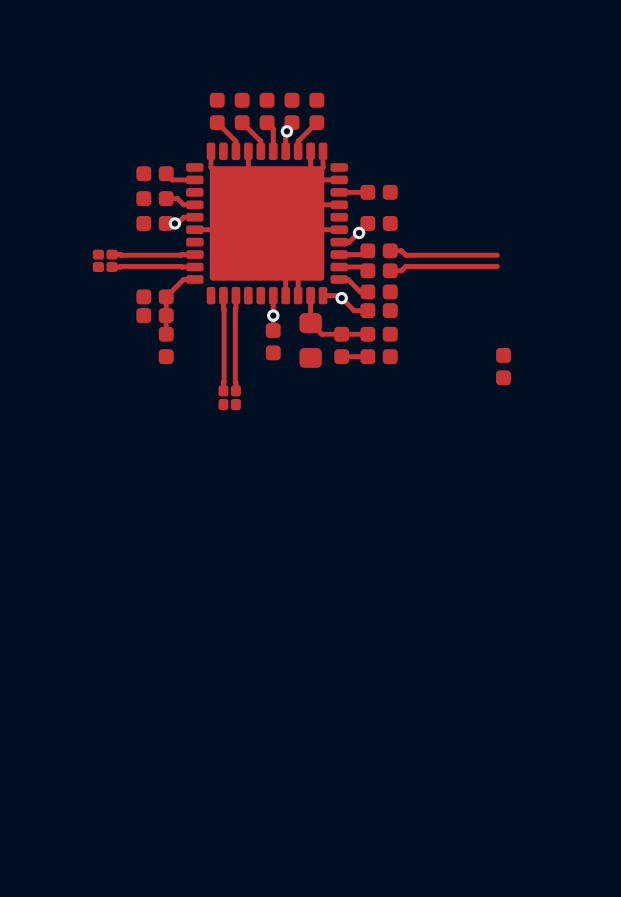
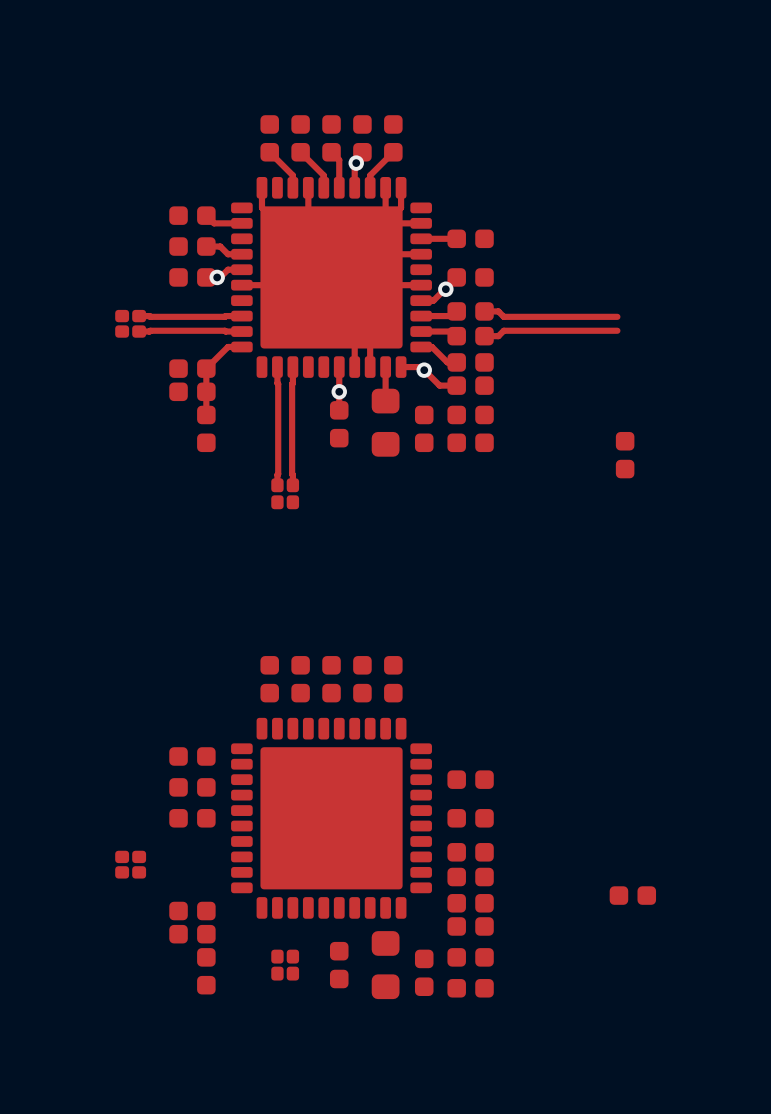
top track: (310, 323) (321, 334) (367, 334) -> none
top track: (367, 356) (341, 356) -> none
part: none -> (269, 679)
part: none -> (300, 679)
part: none -> (331, 679)
part: none -> (362, 679)
part: none -> (393, 679)
part: none -> (192, 756)
part: none -> (470, 779)
part: none -> (192, 787)
part: none -> (192, 818)
part: none -> (331, 818)
part: none -> (470, 818)
part: none -> (470, 852)
part: none -> (130, 856)
part: none -> (130, 872)
part: none -> (470, 877)
part: none -> (632, 895)
part: none -> (470, 903)
part: none -> (192, 911)
part: none -> (470, 926)
part: none -> (192, 934)
part: none -> (470, 957)
part: none -> (277, 965)
part: none -> (292, 965)
part: none -> (339, 965)
part: none -> (385, 965)
part: none -> (206, 971)
part: none -> (424, 972)
part: none -> (470, 988)

